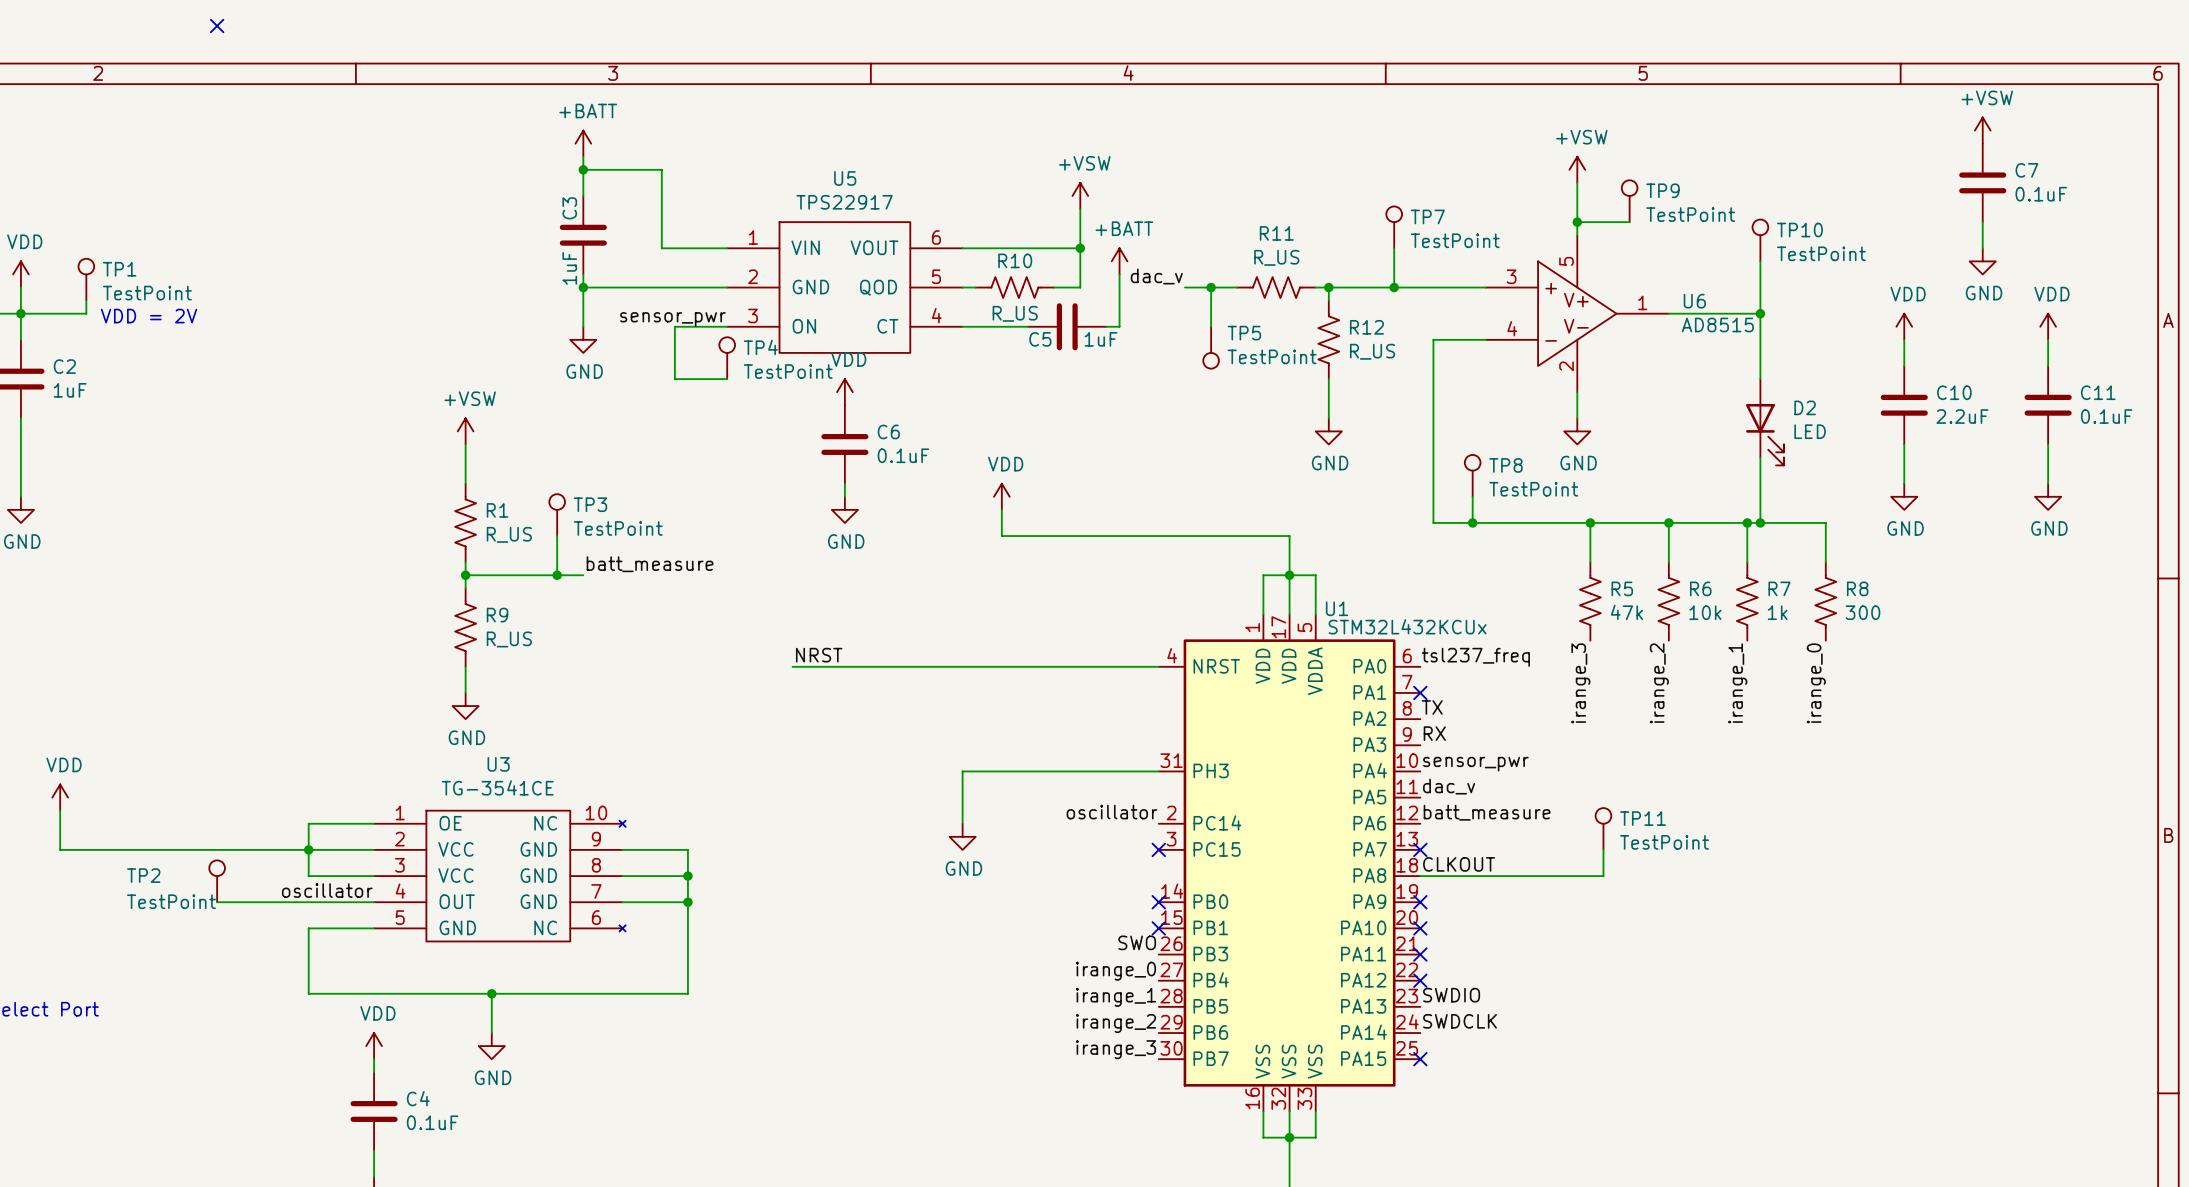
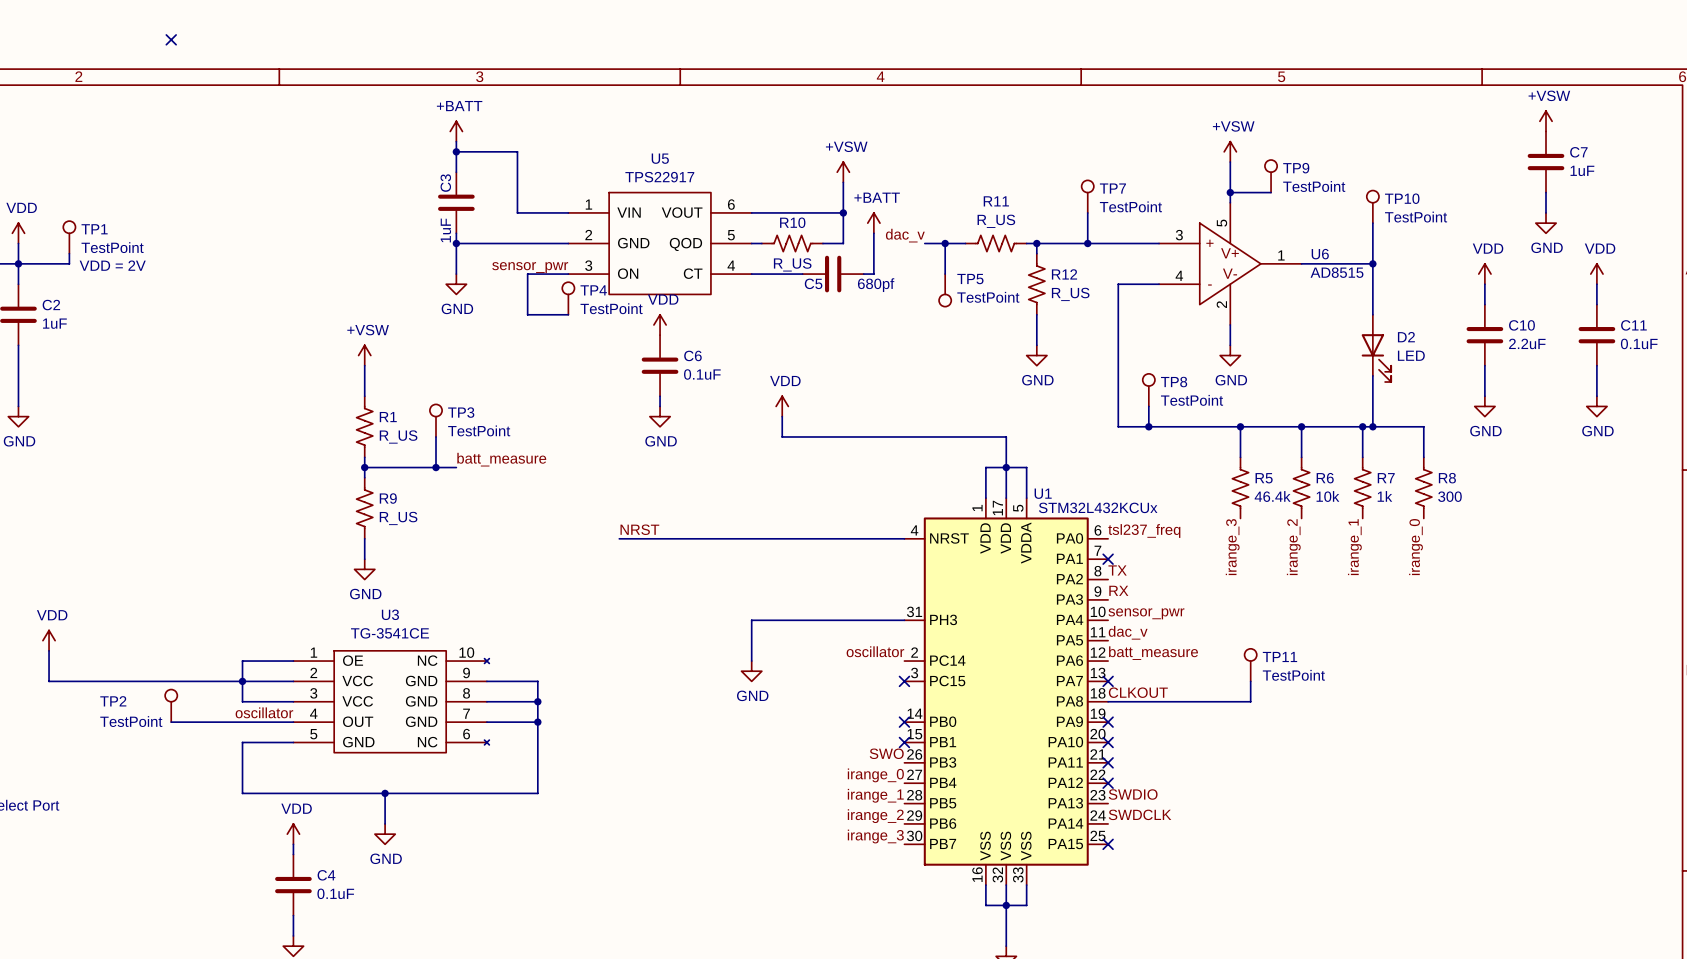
C7 value: 0.1uF (2041, 194) -> 1uF (1582, 170)
C5 value: 1uF (1101, 339) -> 680pf (876, 285)
R5 value: 47k (1626, 612) -> 46.4k (1272, 496)

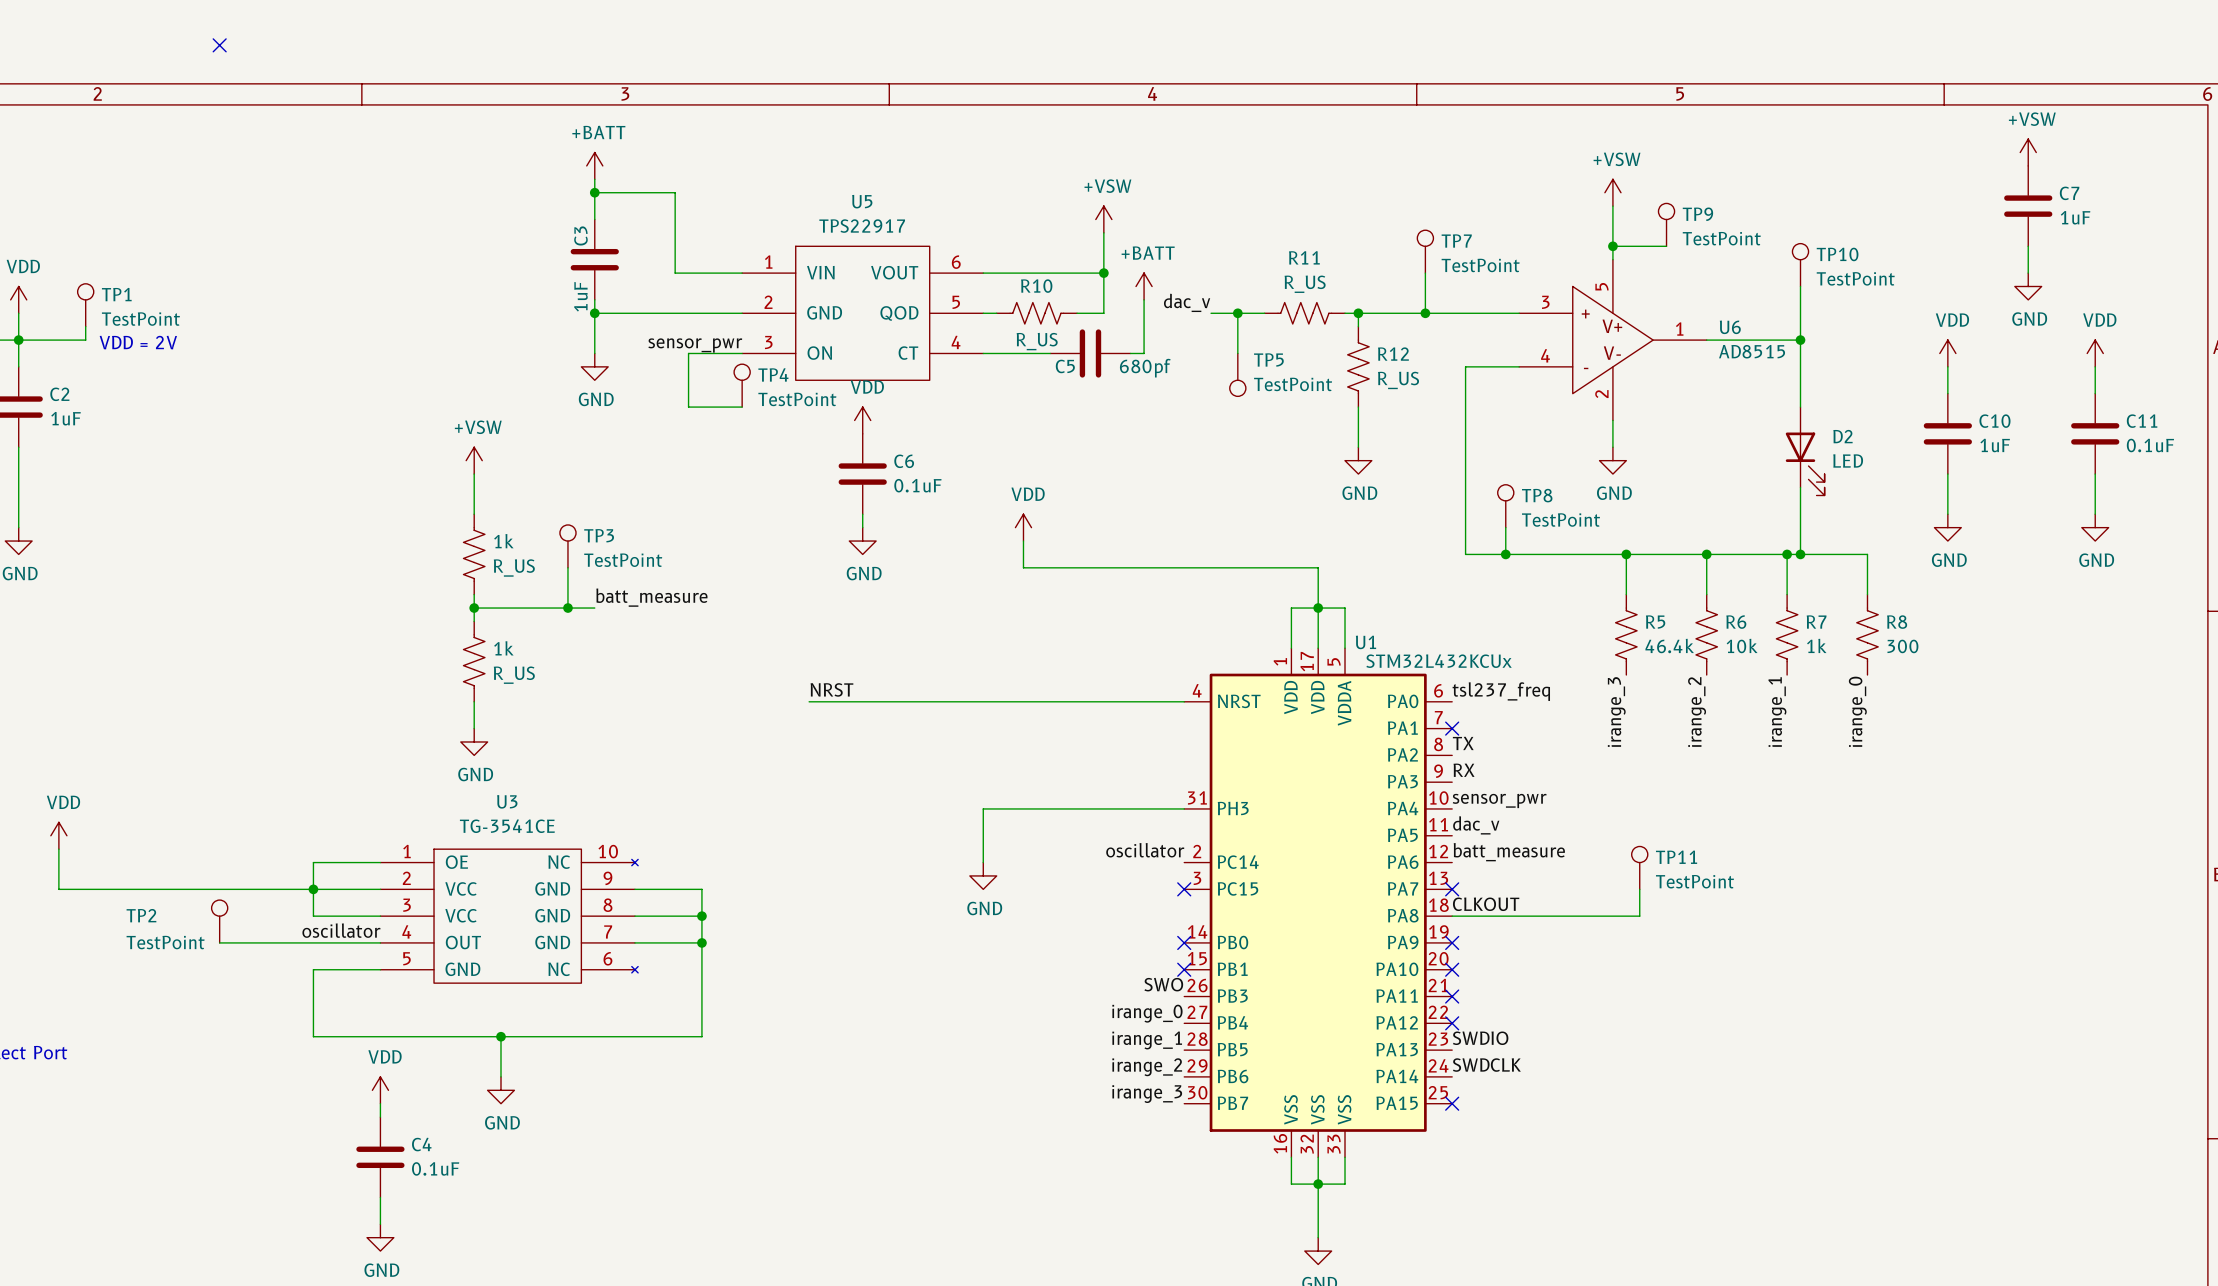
C10 value: 2.2uF (1527, 343) -> 1uF (1995, 445)
R1 name: R1 (388, 417) -> 1k (503, 541)
R9 name: R9 (388, 498) -> 1k (503, 648)

